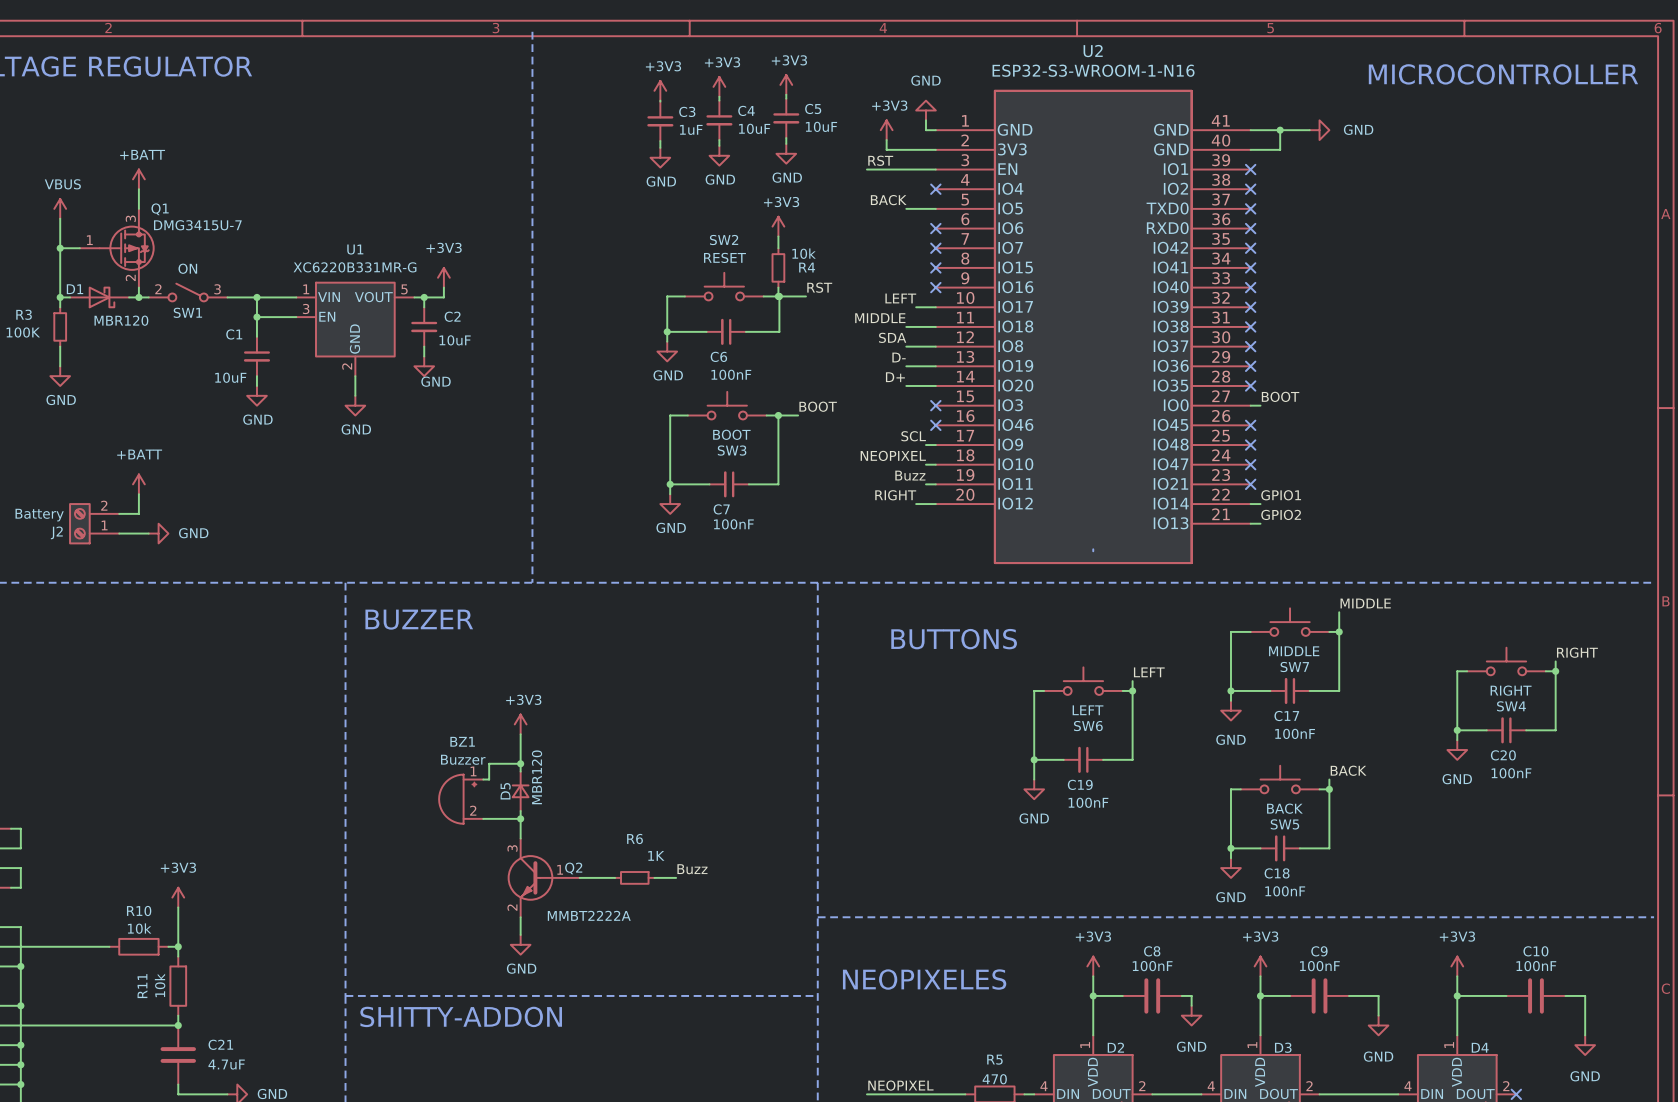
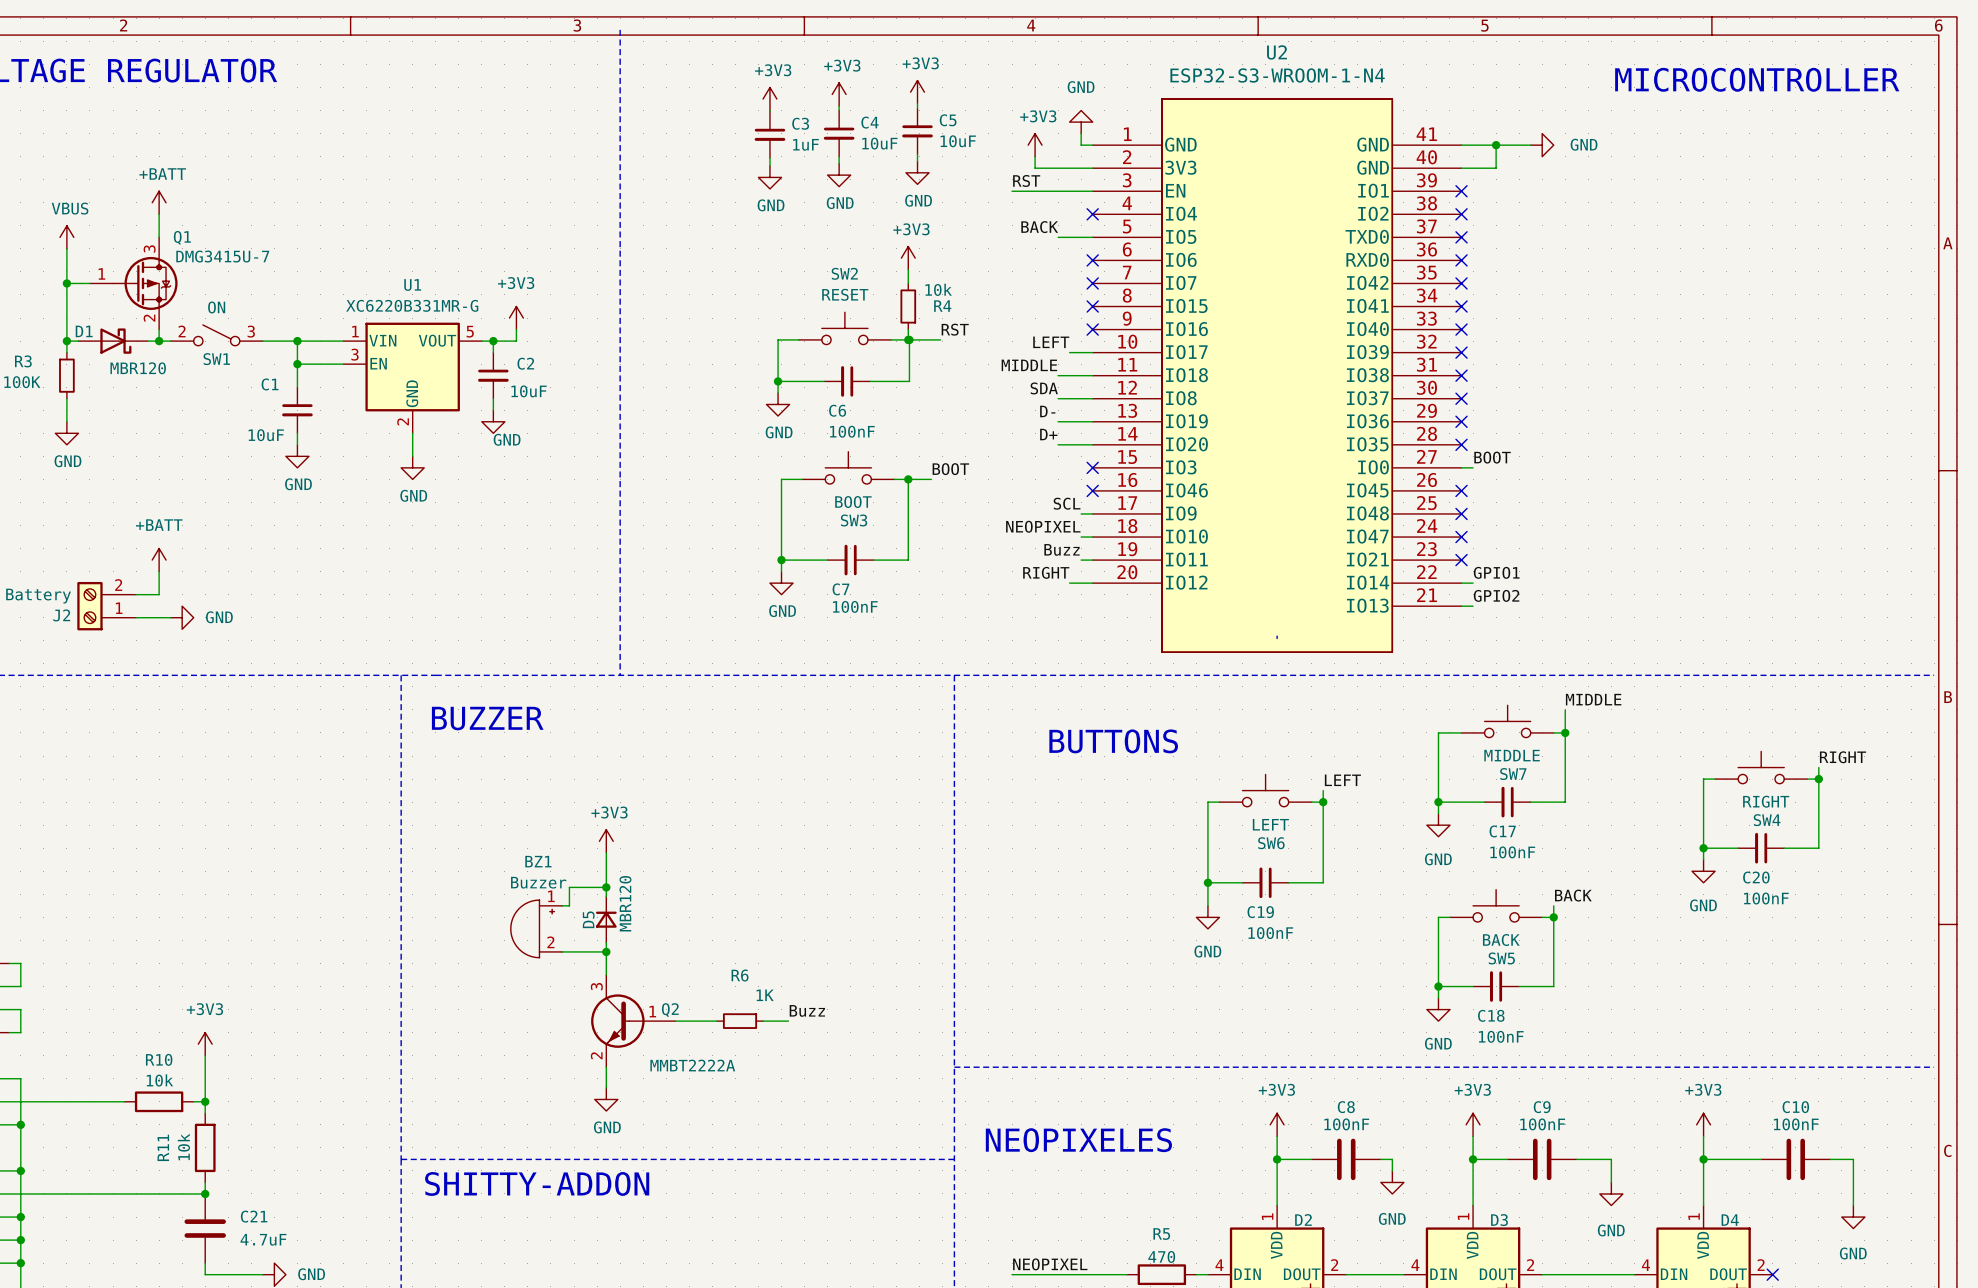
U2 value: ESP32-S3-WROOM-1-N16 (1093, 70) -> ESP32-S3-WROOM-1-N4 (1277, 75)

